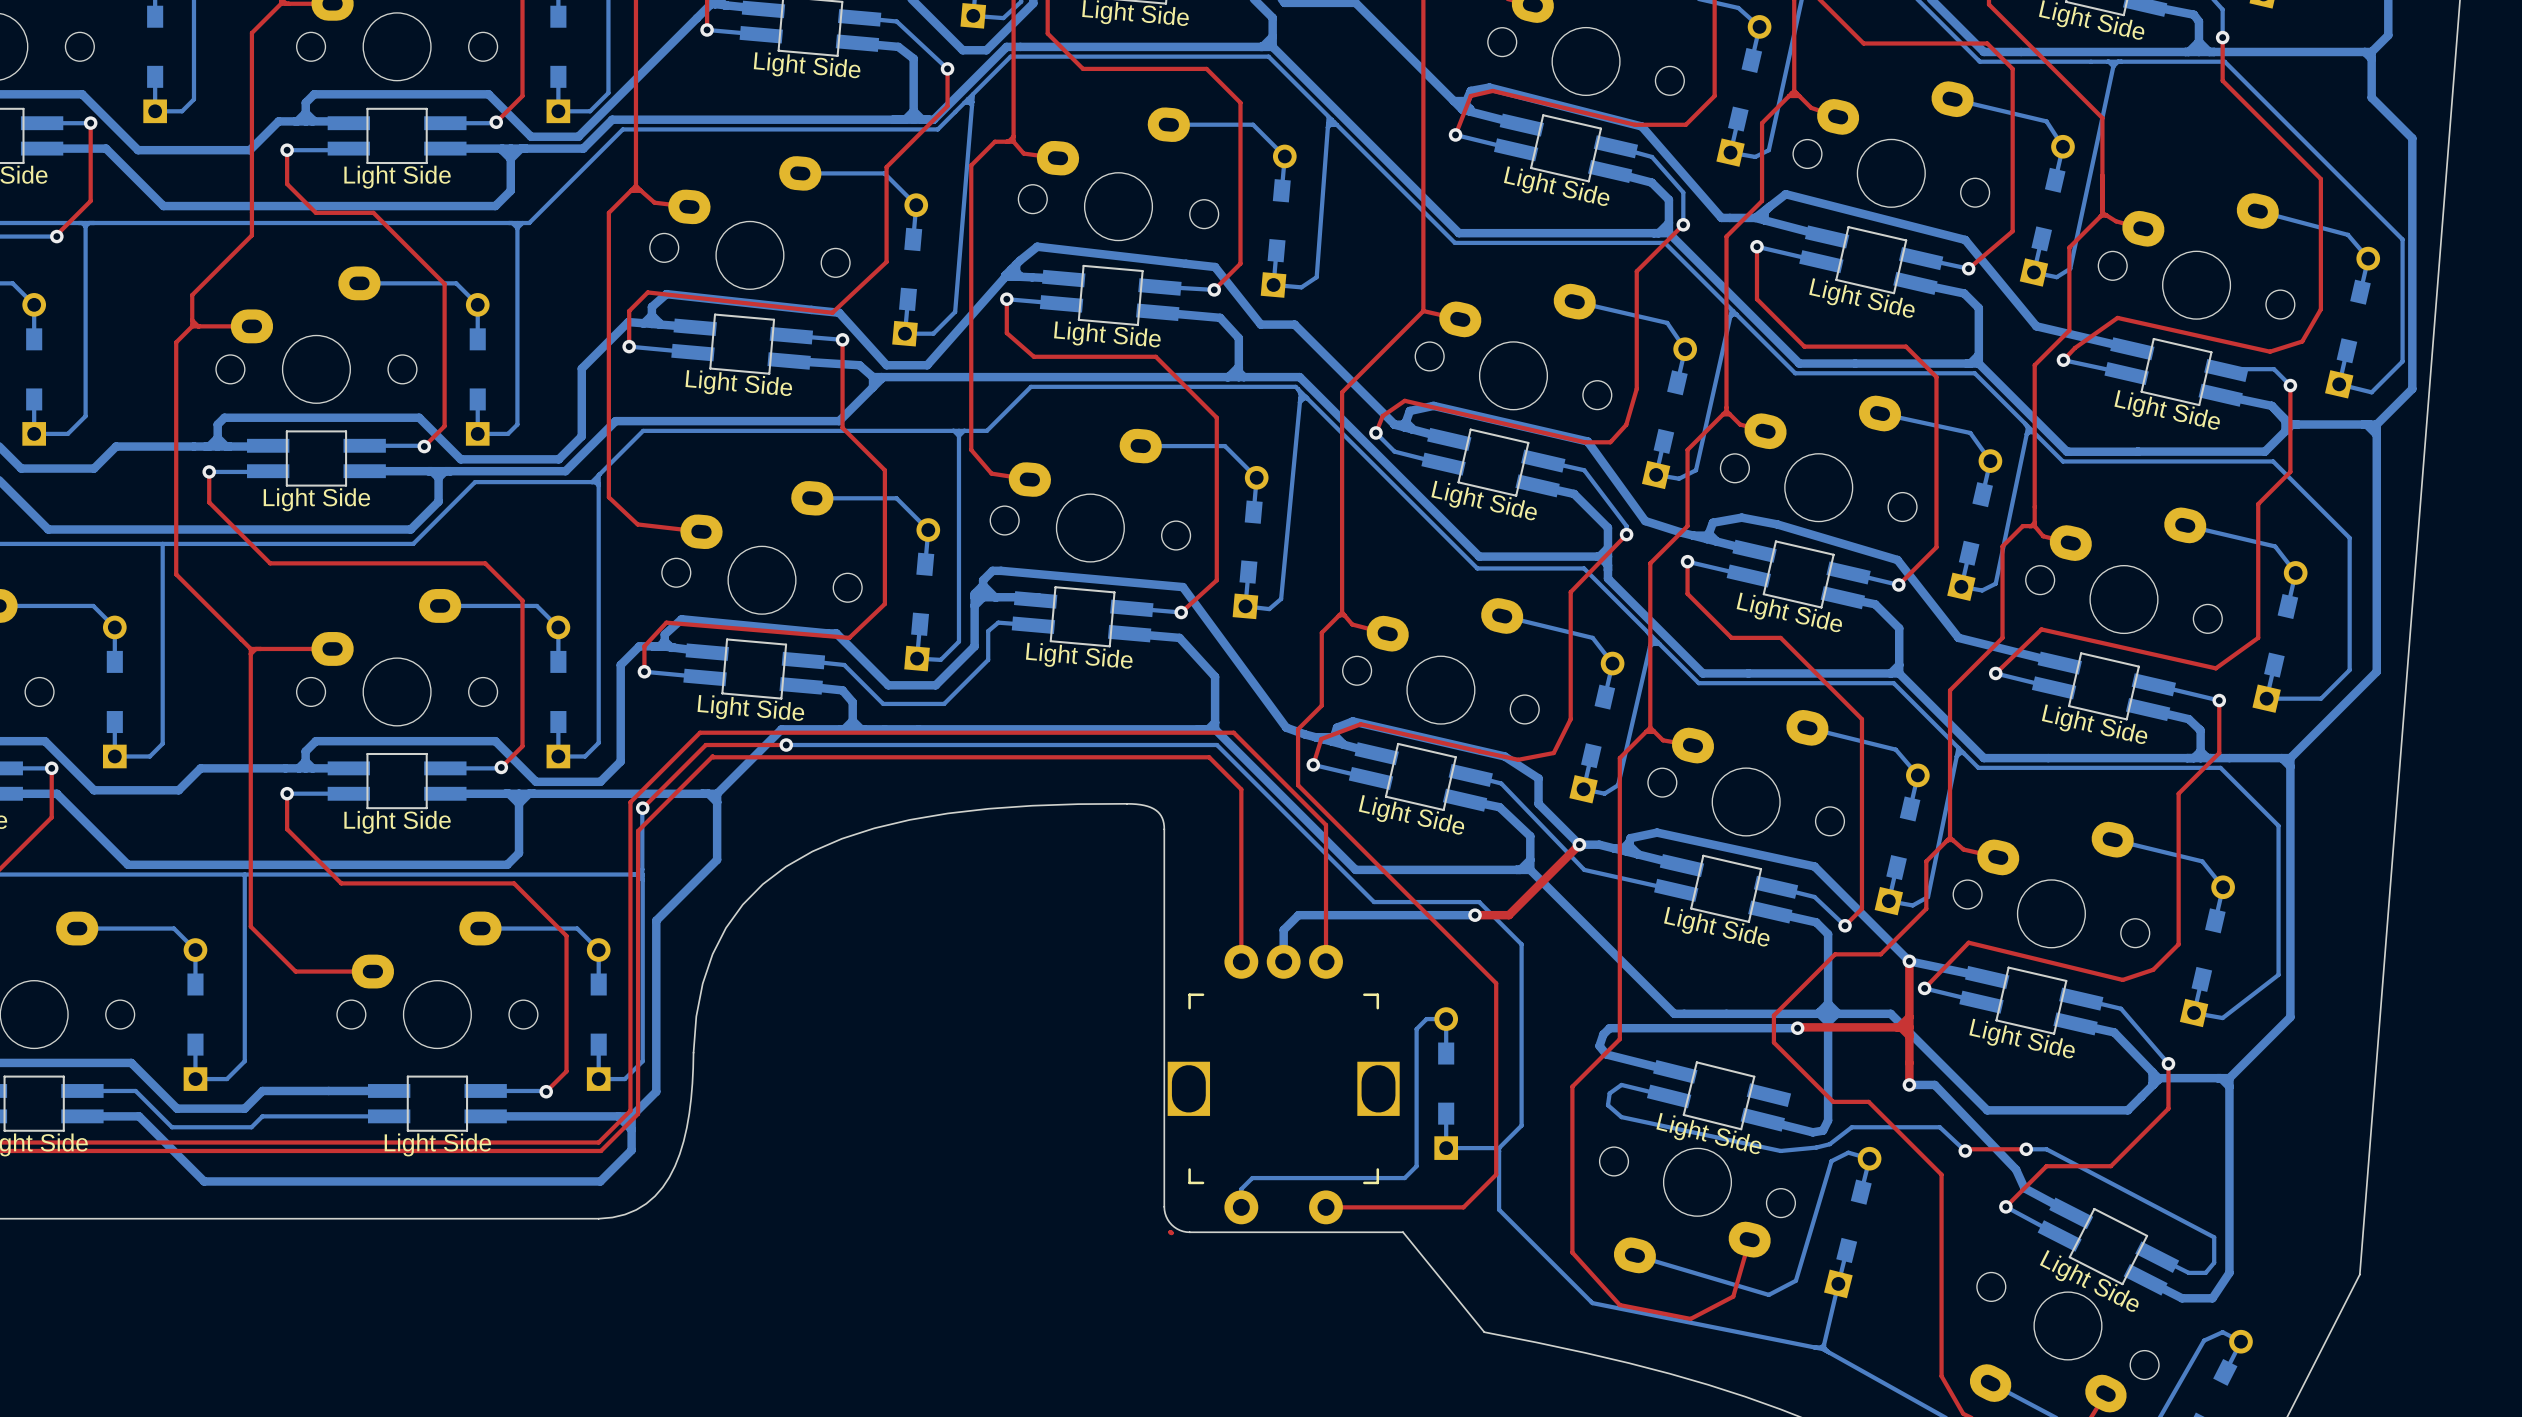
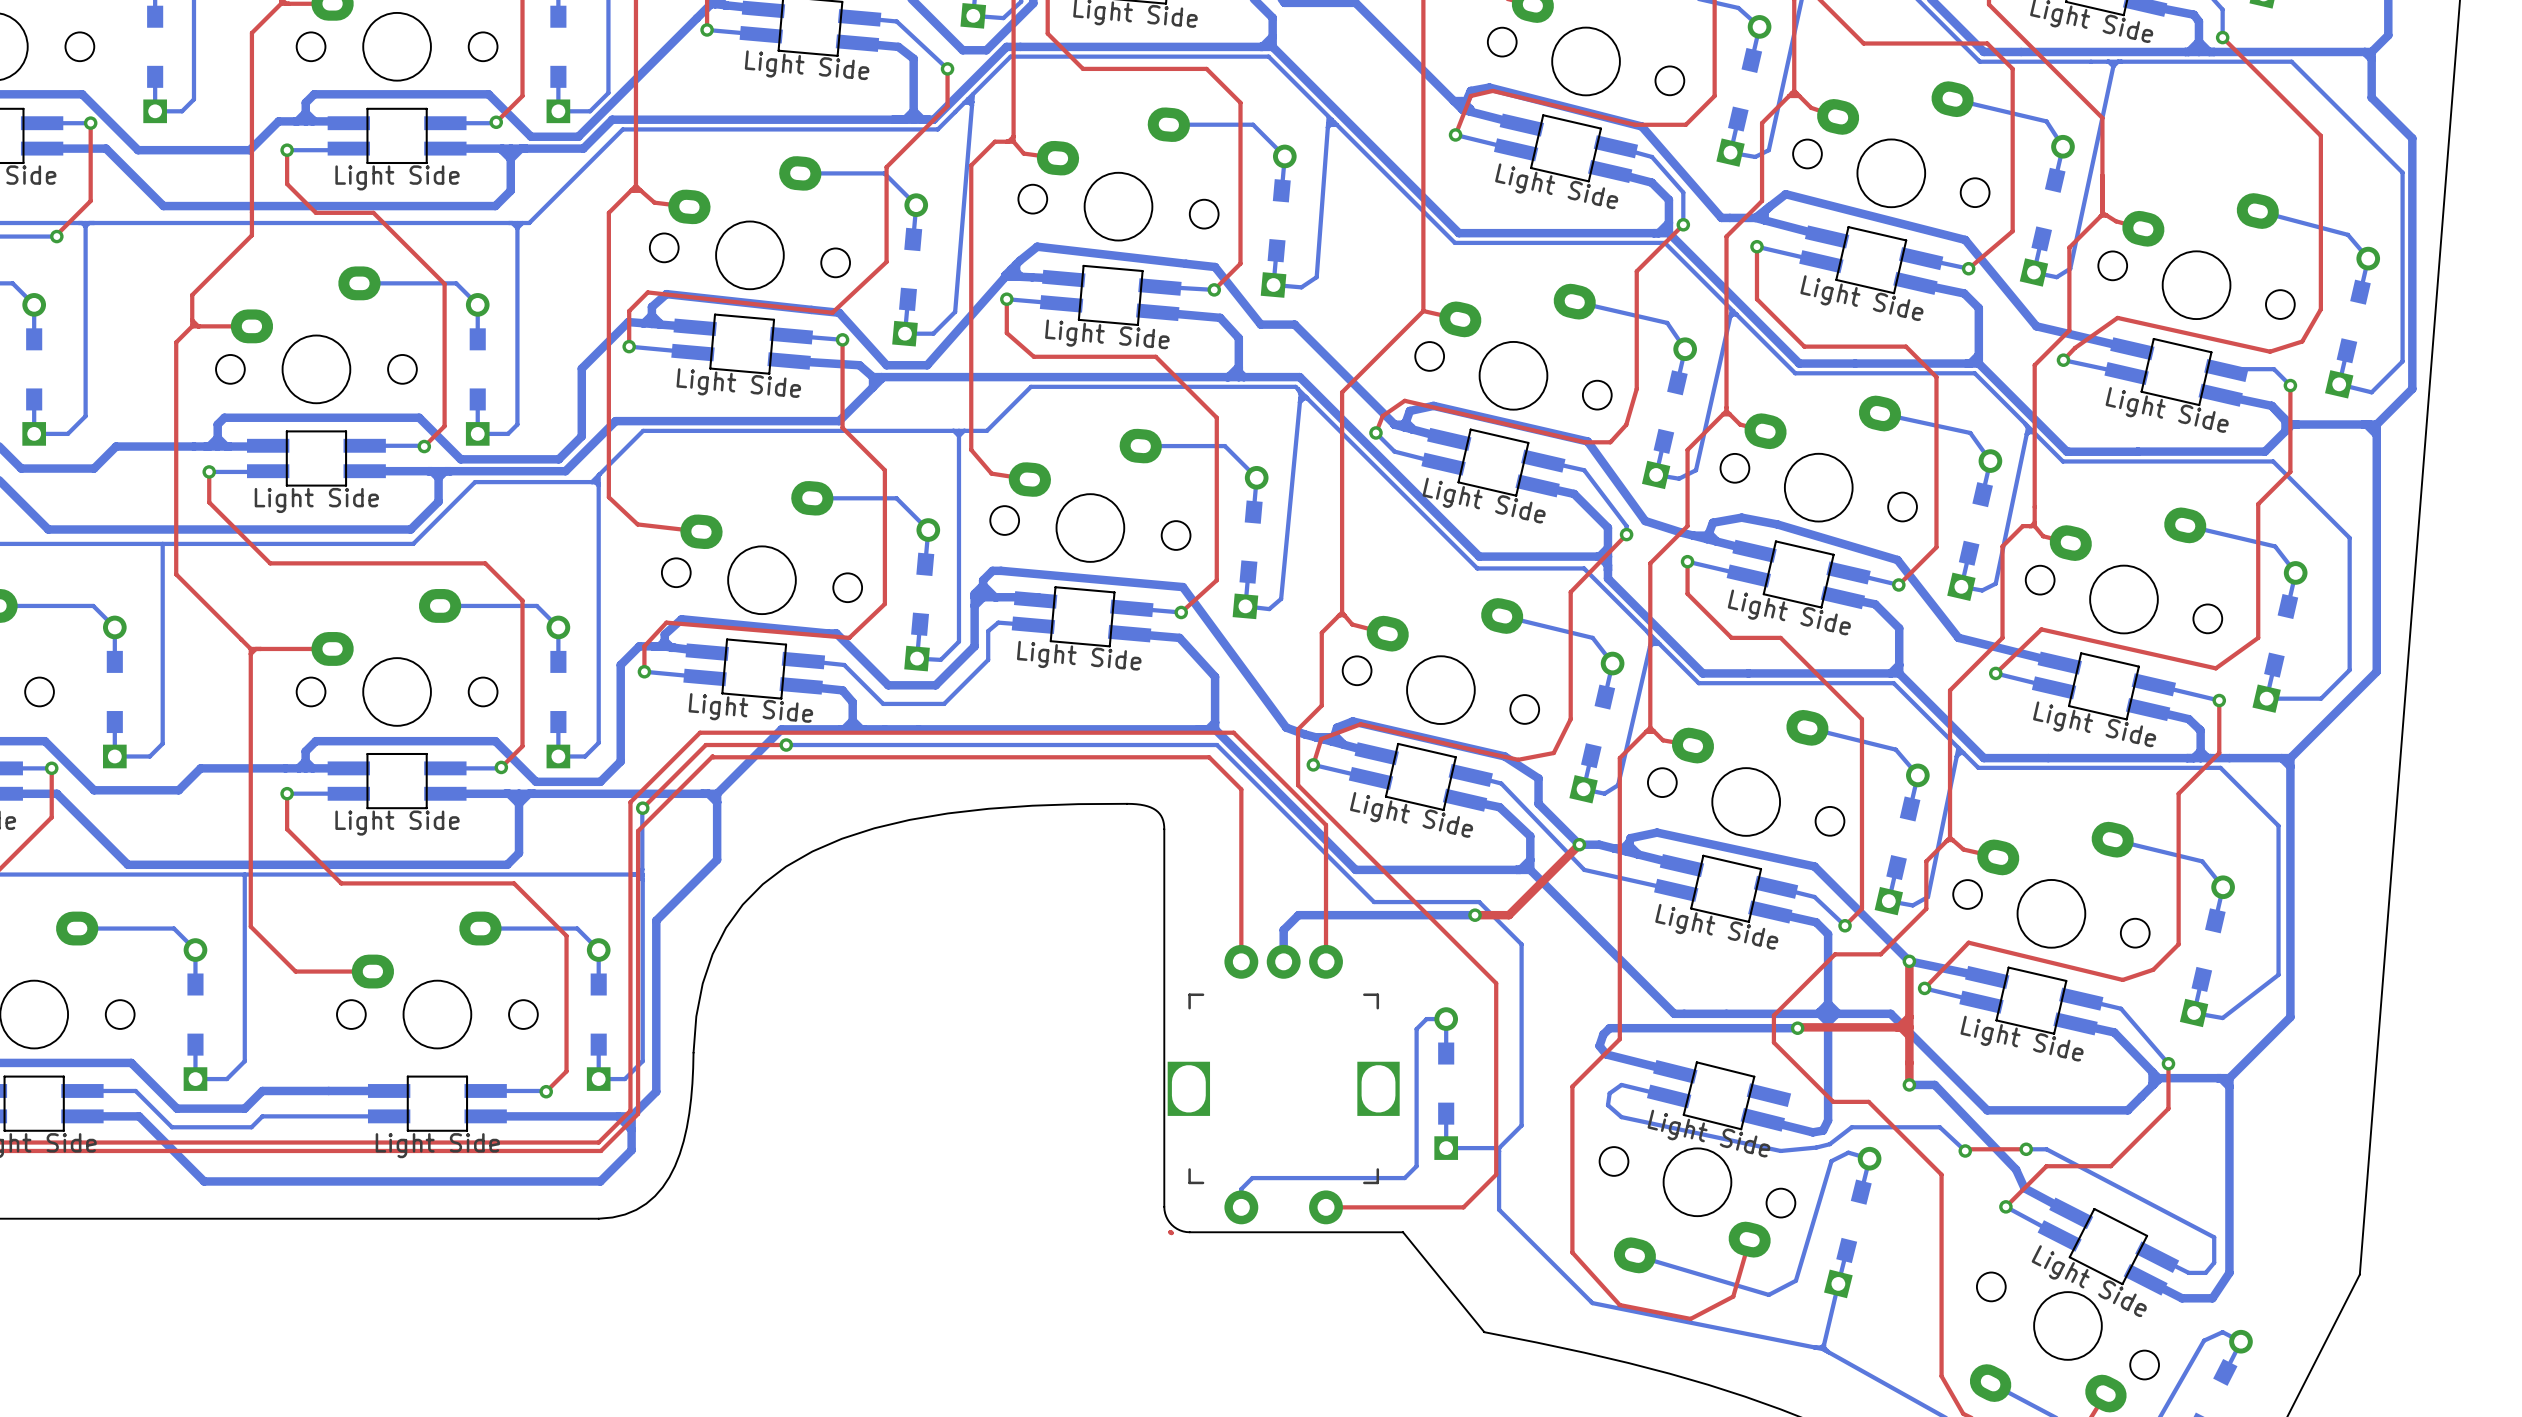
top track: (2222, 37) (2222, 80) (2320, 178) -> (2222, 37) (2320, 135) (2320, 178)
bottom track: (2224, 61) (2402, 239) -> (2224, 61) (2291, 61) (2402, 172) (2402, 239)

